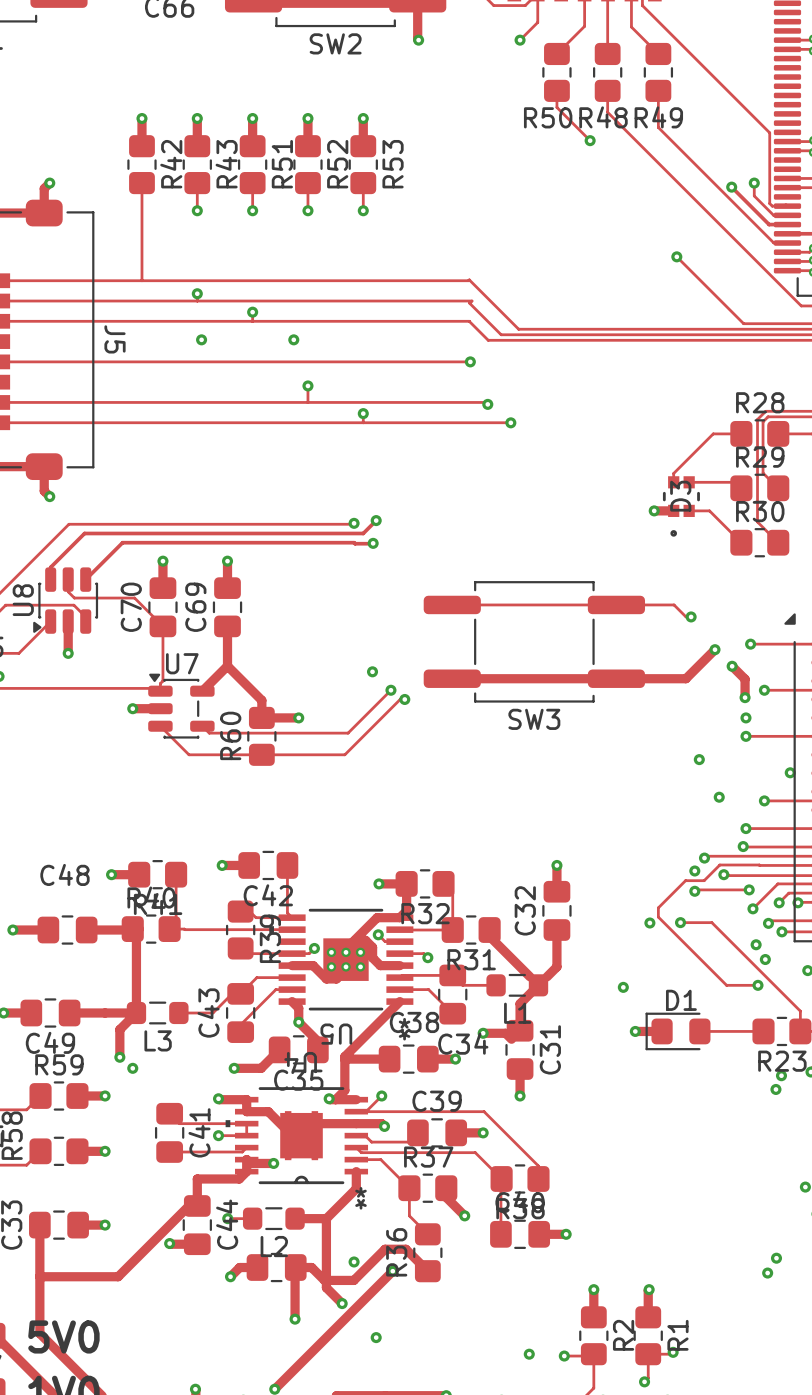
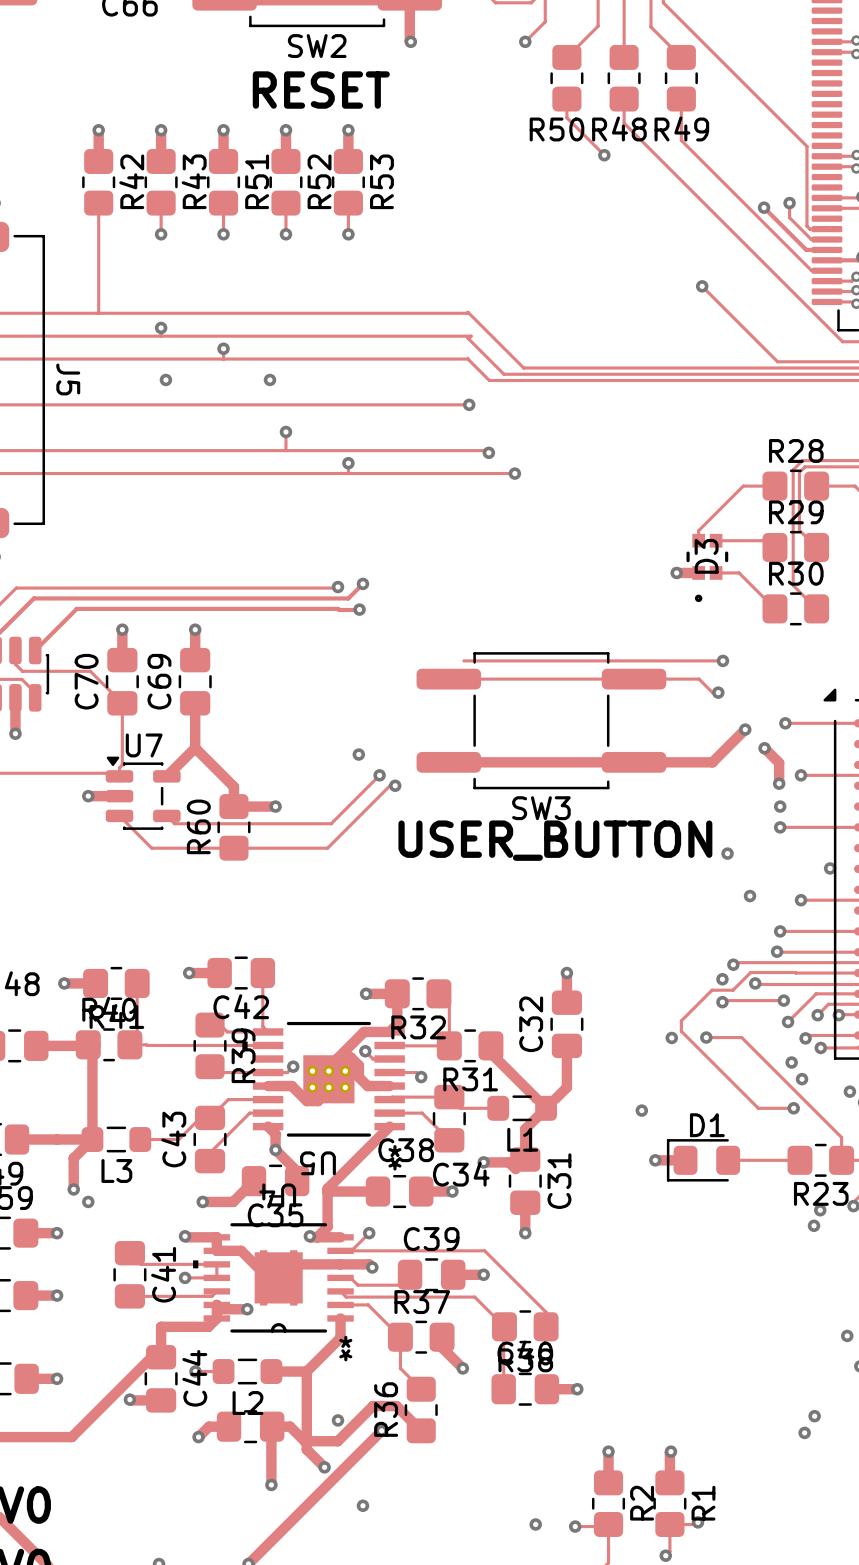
text: none -> RESET (321, 90)
track: none -> (463, 660) (722, 660)
via: none -> (722, 660)
text: none -> USER_BUTTON (555, 840)

